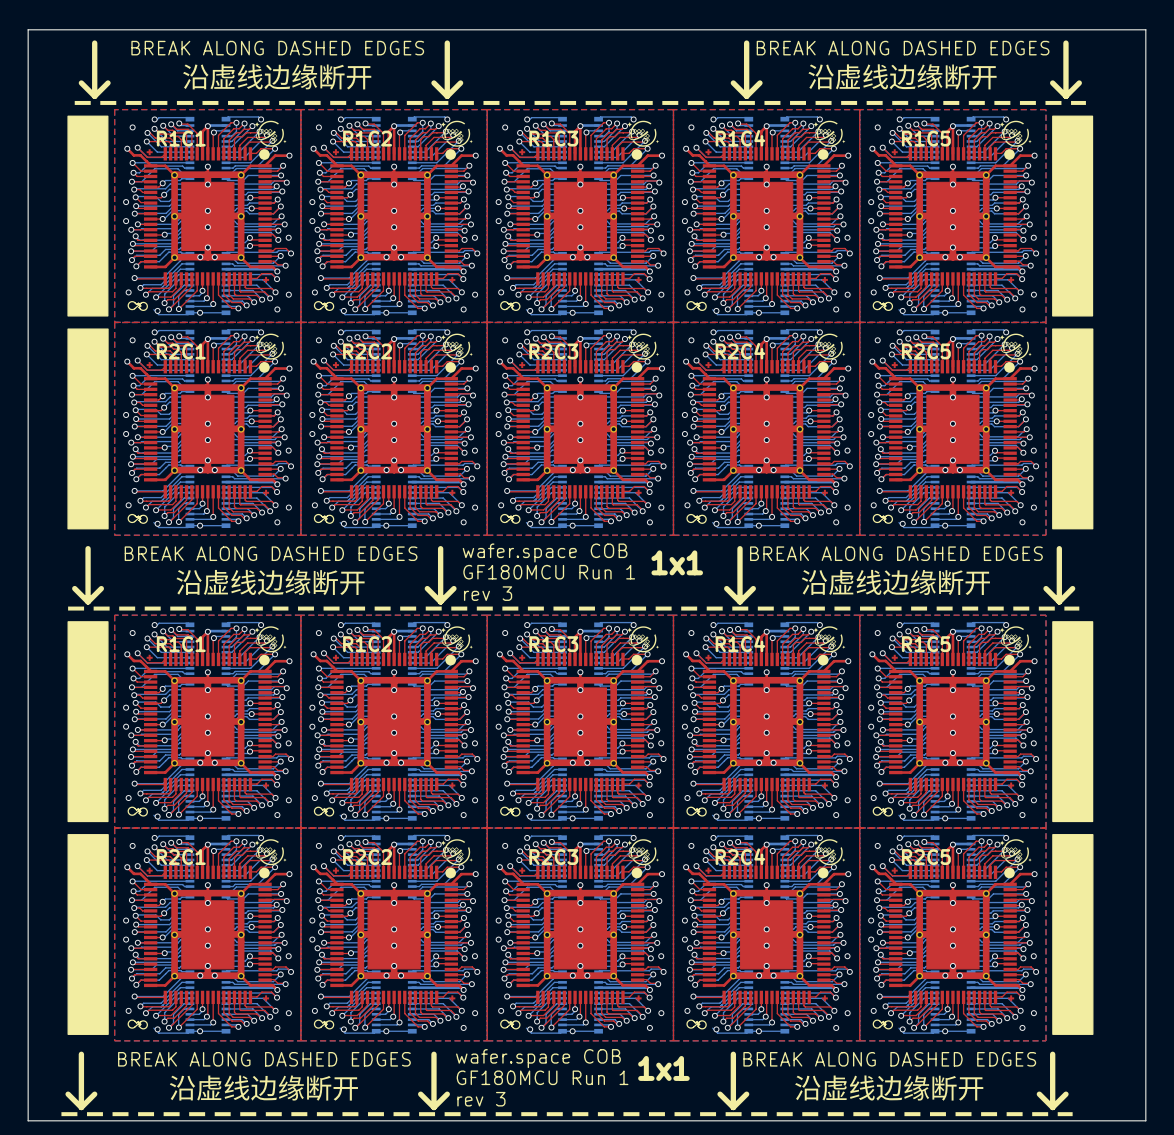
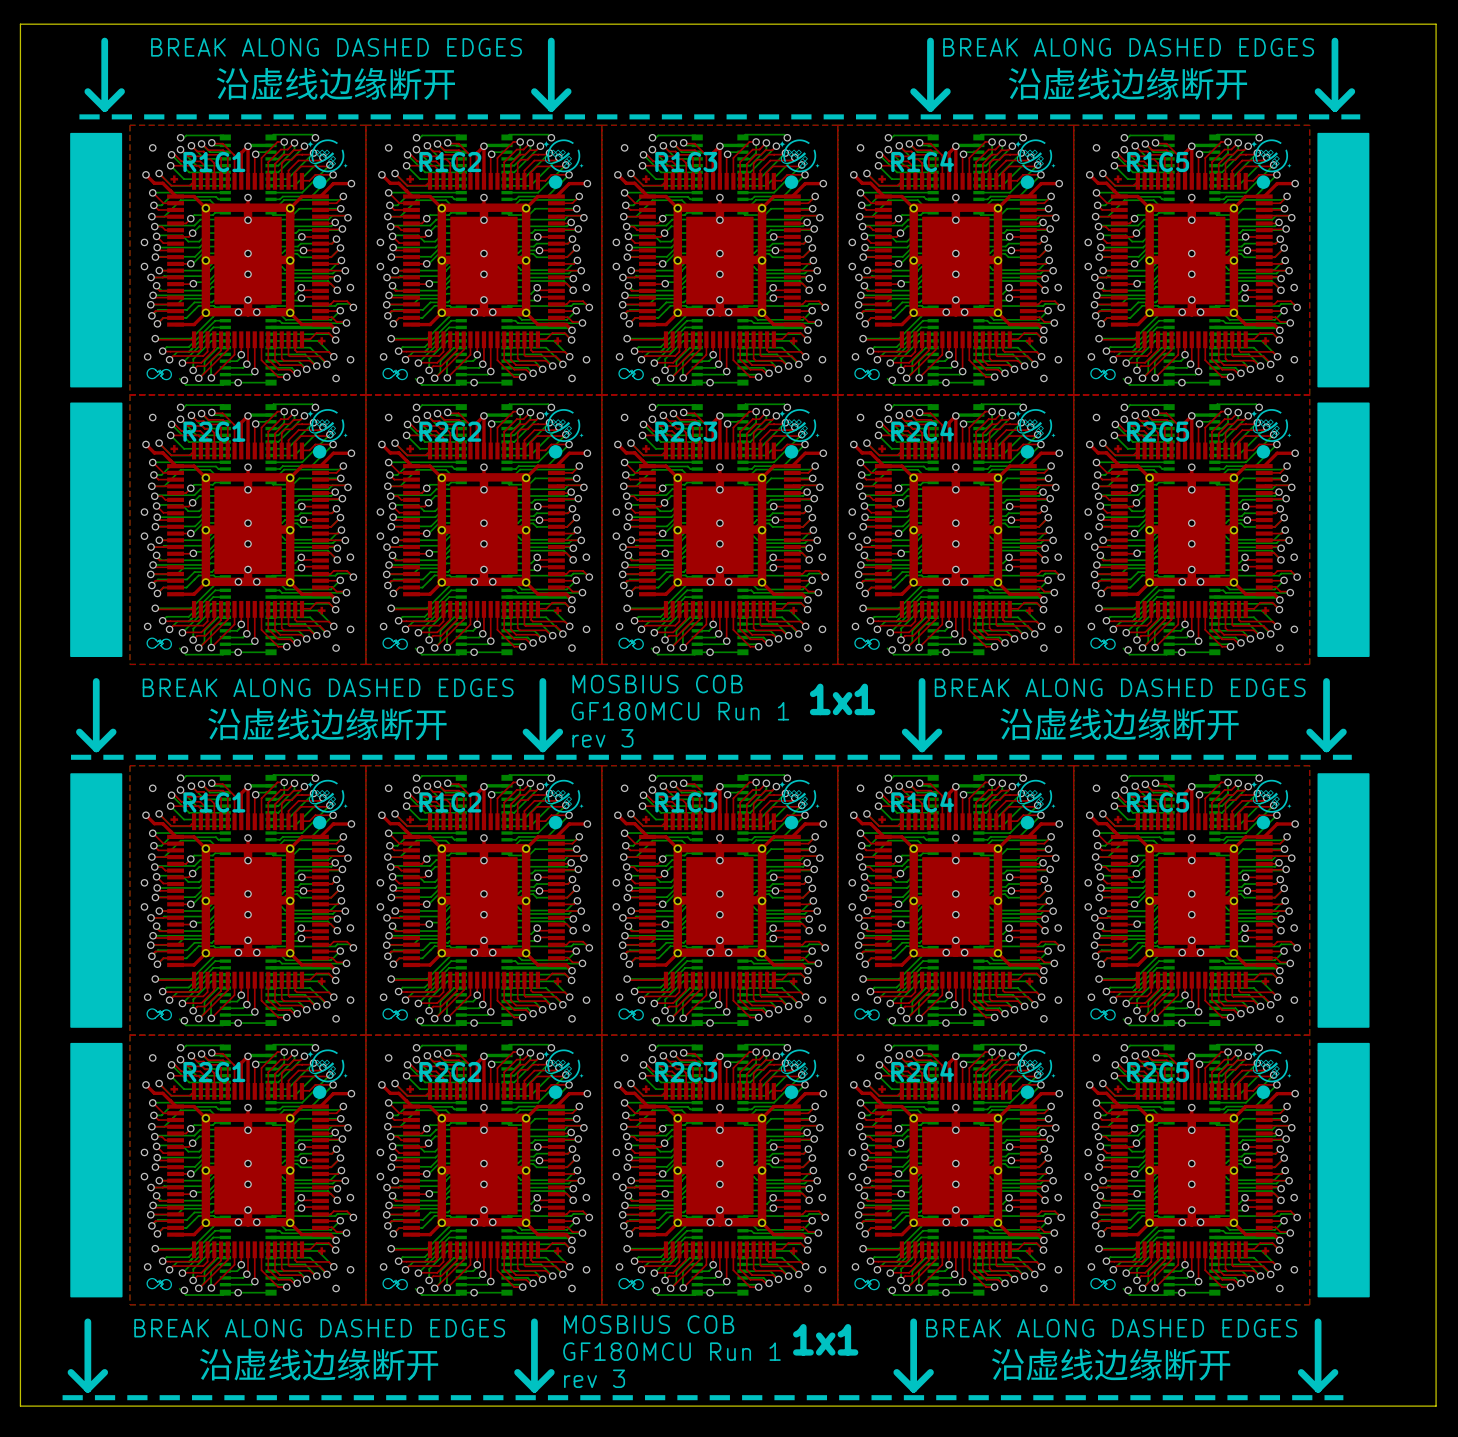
text: wafer.space COB (545, 552) -> MOSBIUS COB (657, 684)
text: wafer.space COB (538, 1058) -> MOSBIUS COB (649, 1324)

